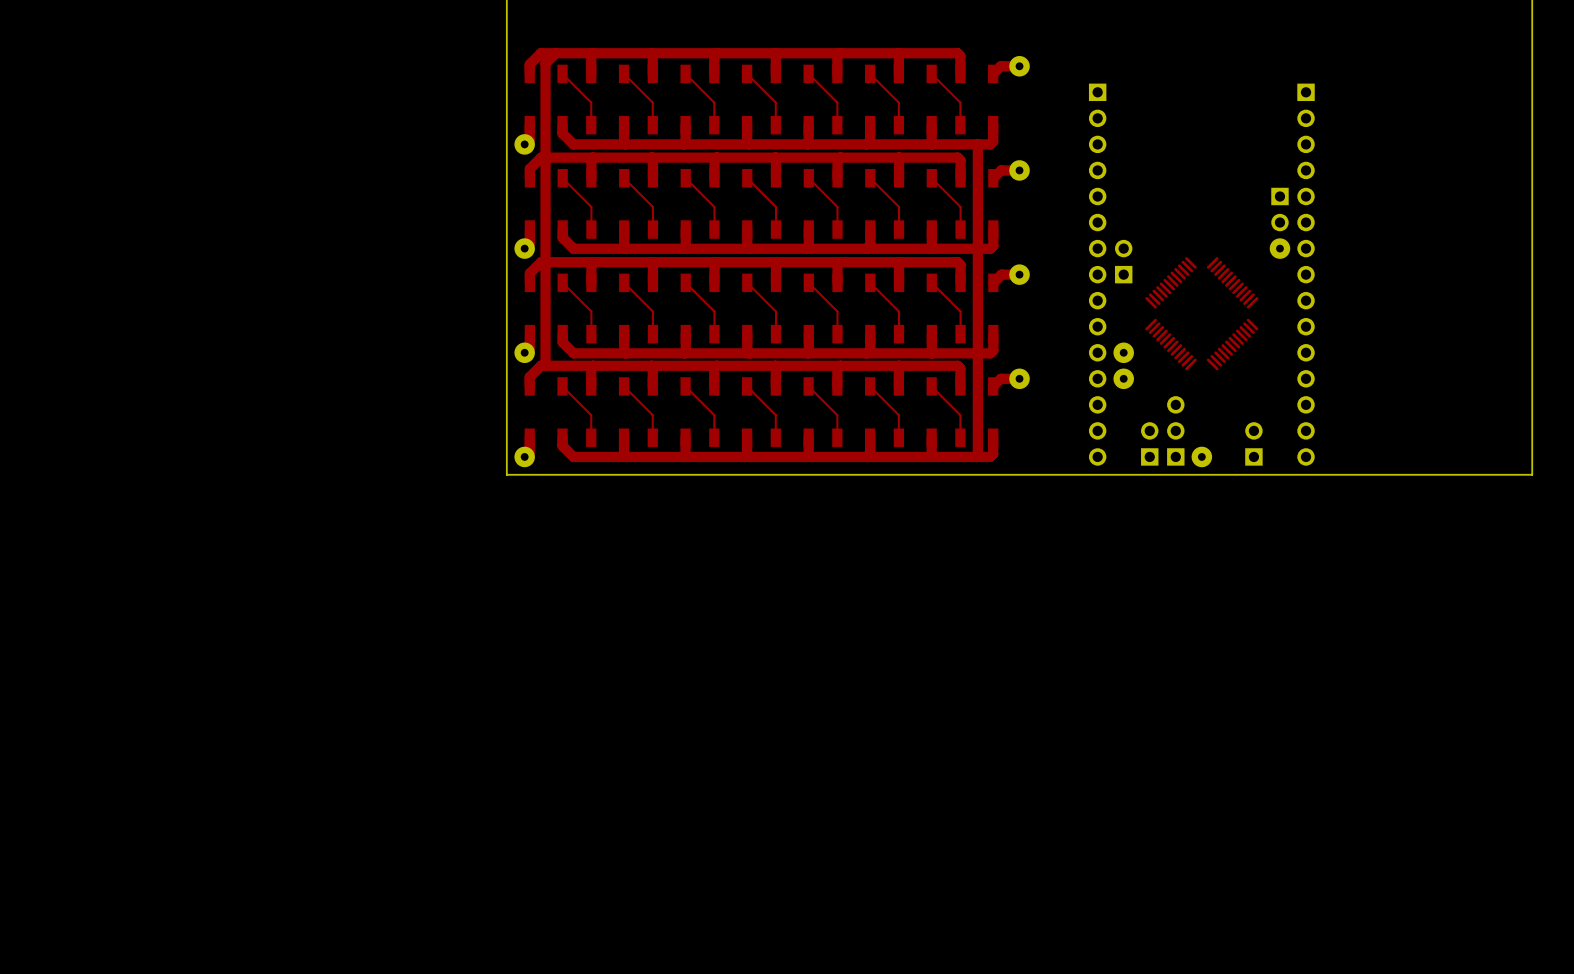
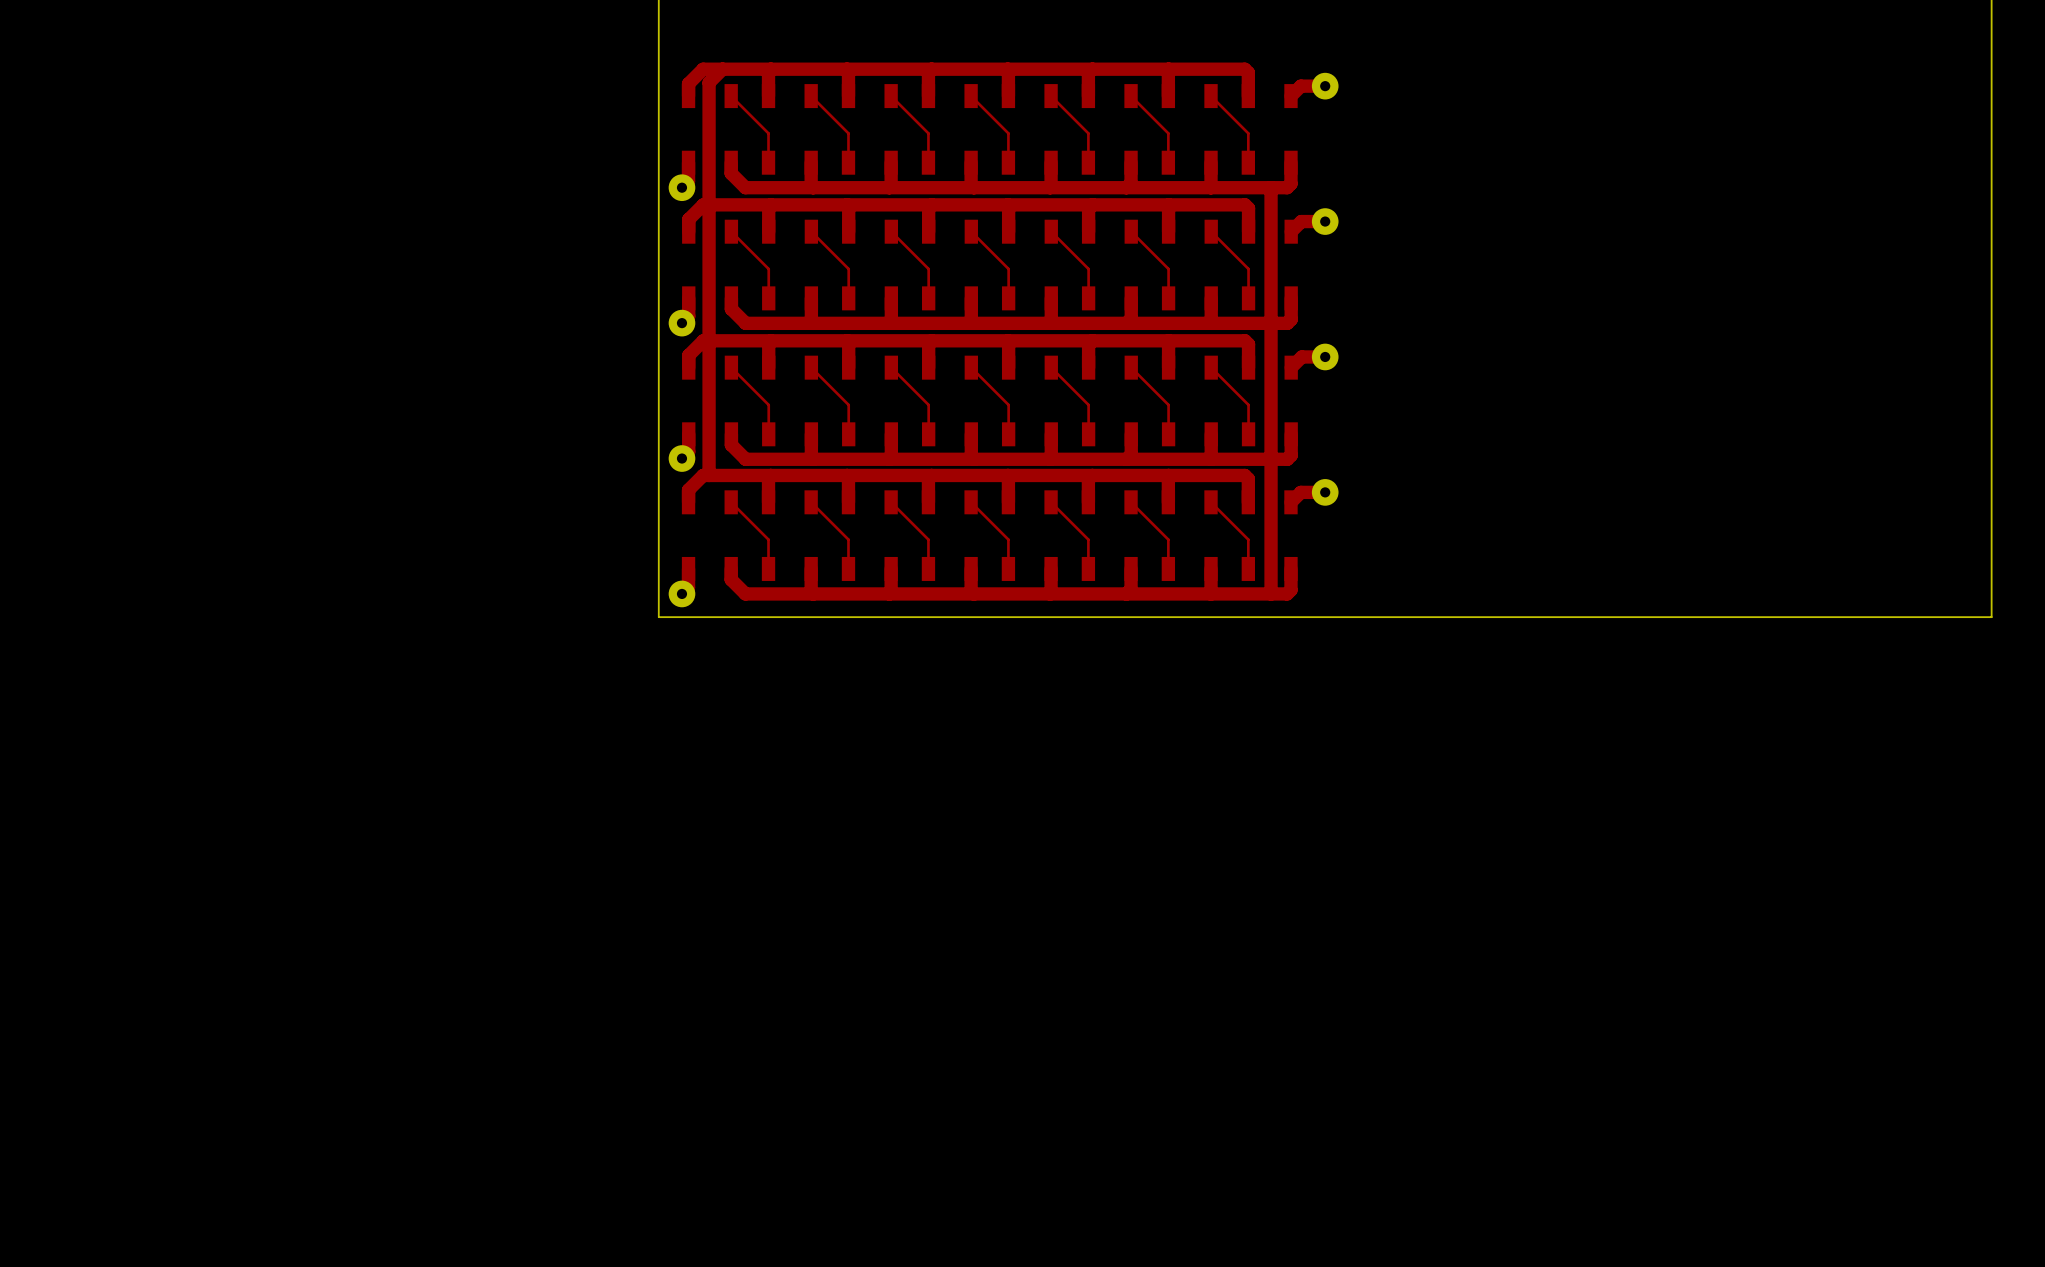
part: (1279, 209) -> none
part: (1279, 248) -> none
part: (1123, 261) -> none
part: (1097, 274) -> none
part: (1306, 274) -> none
part: (1201, 313) -> none
part: (1123, 352) -> none
part: (1123, 378) -> none
part: (1175, 430) -> none
part: (1149, 443) -> none
part: (1253, 443) -> none
part: (1201, 456) -> none

